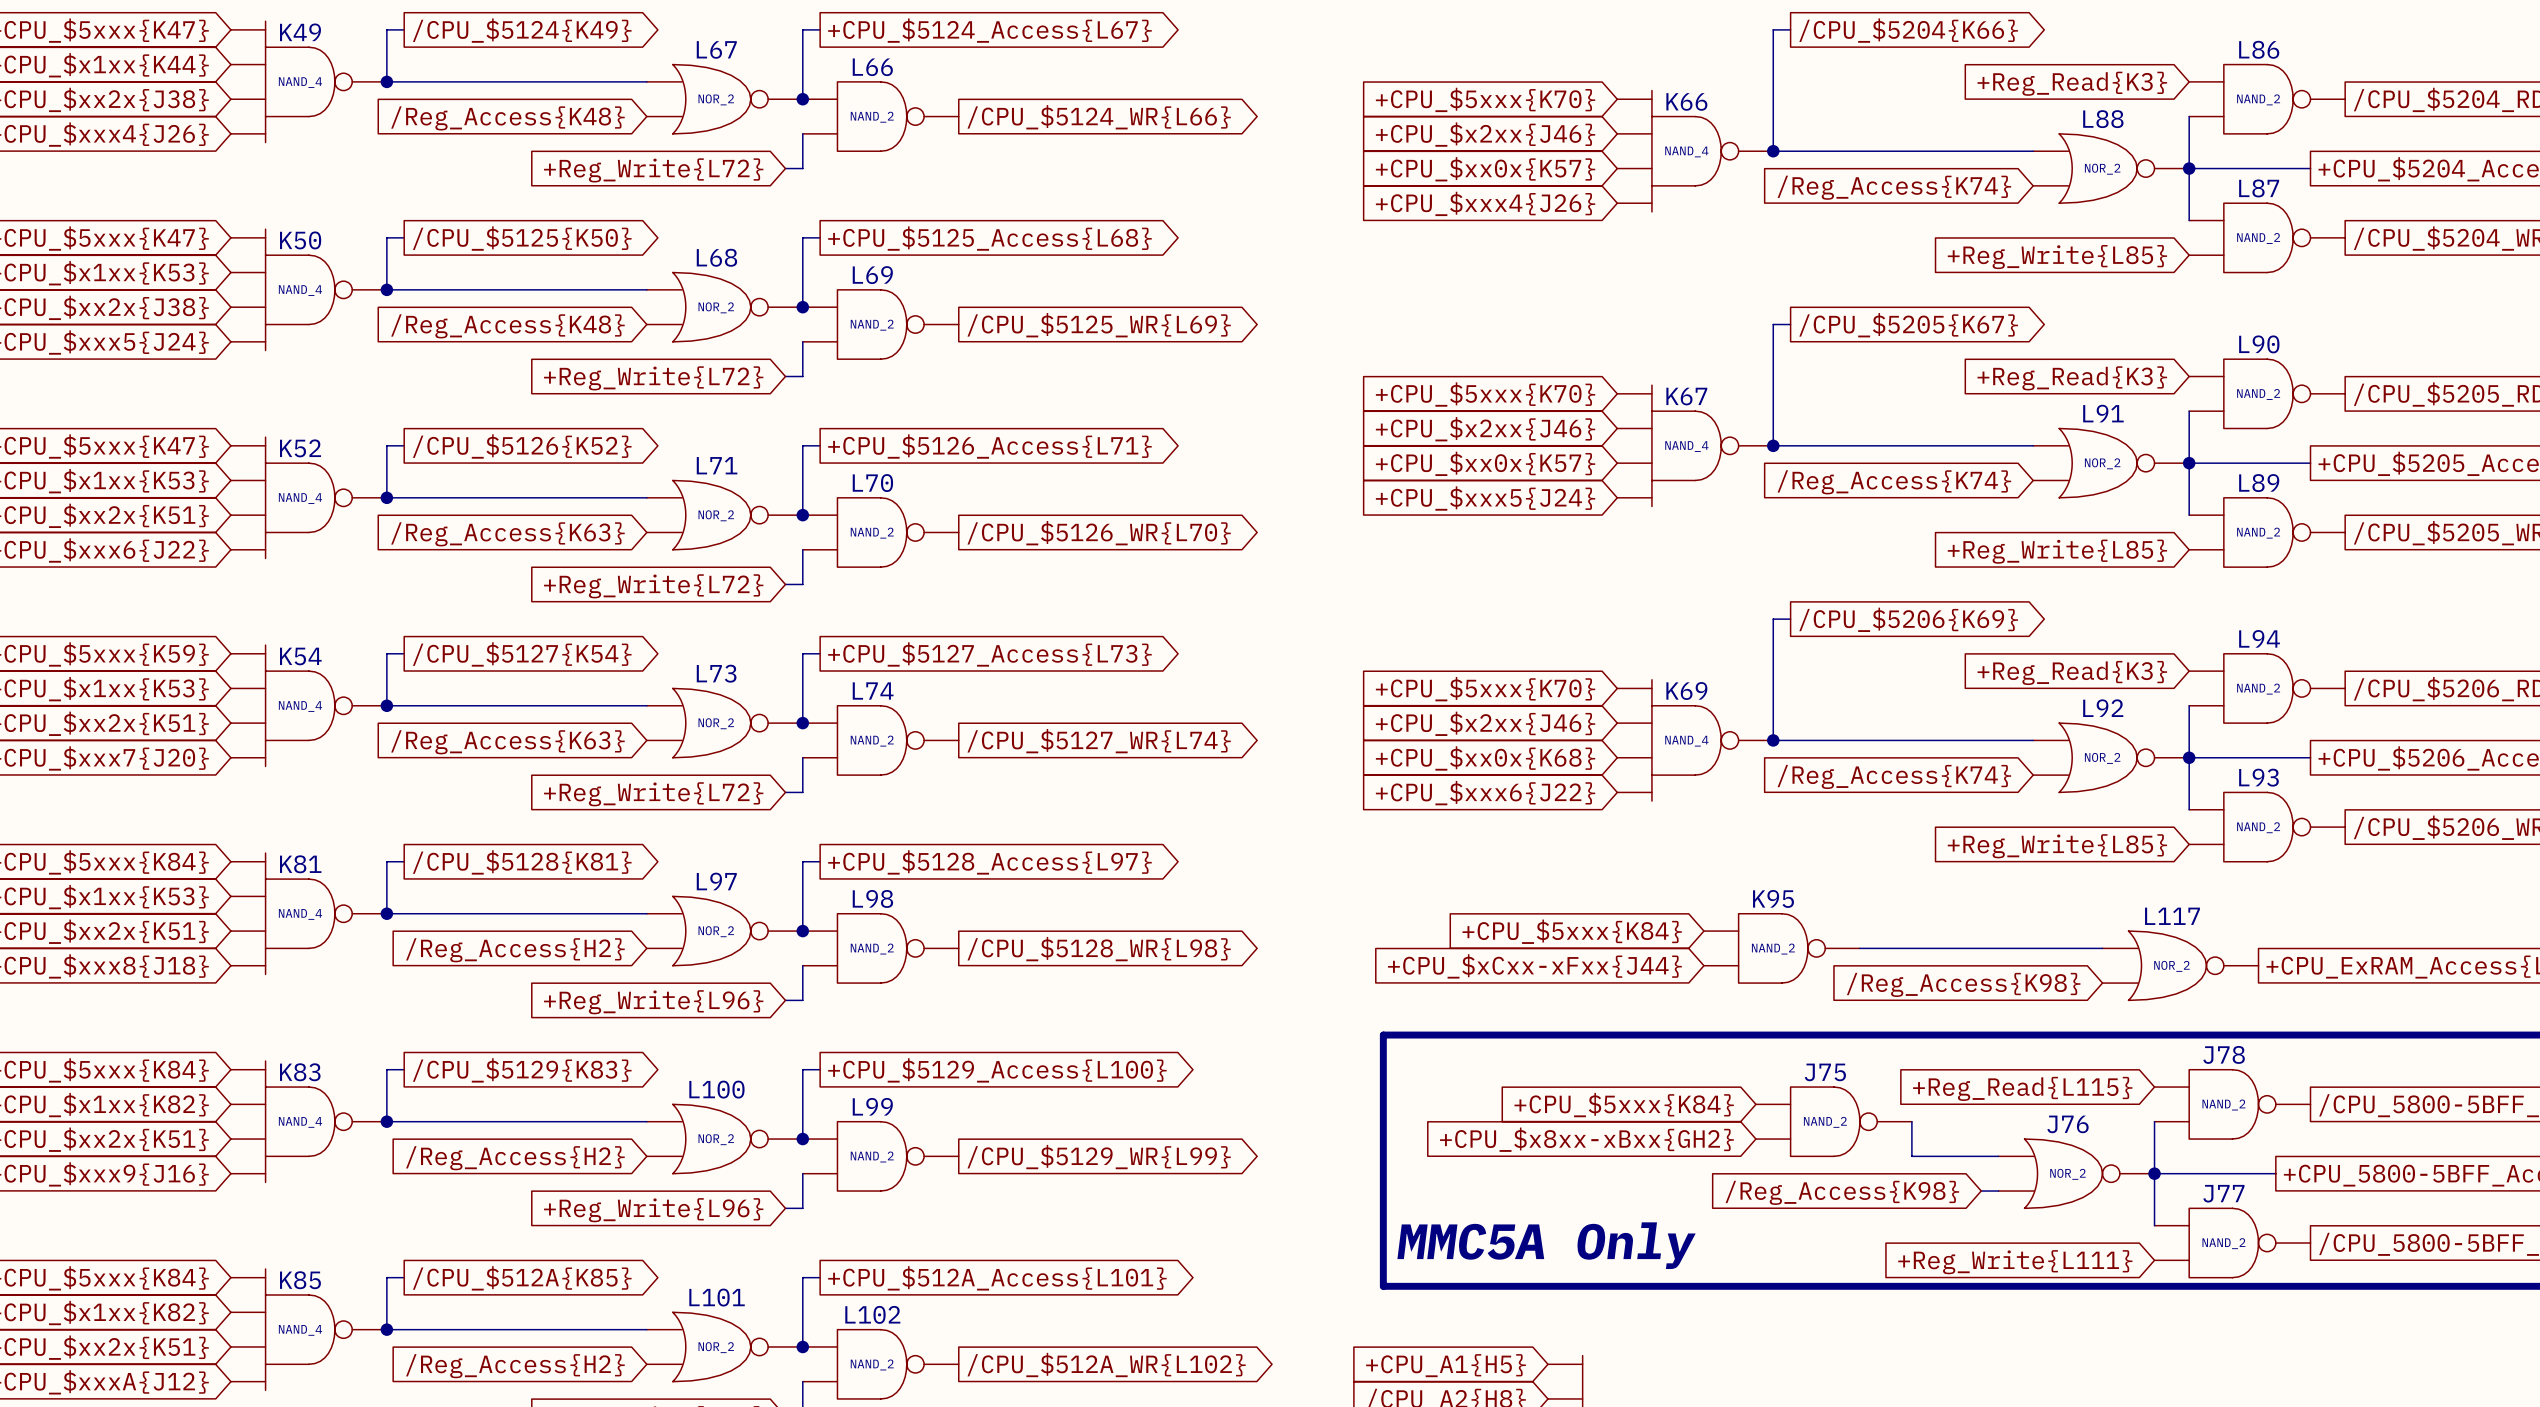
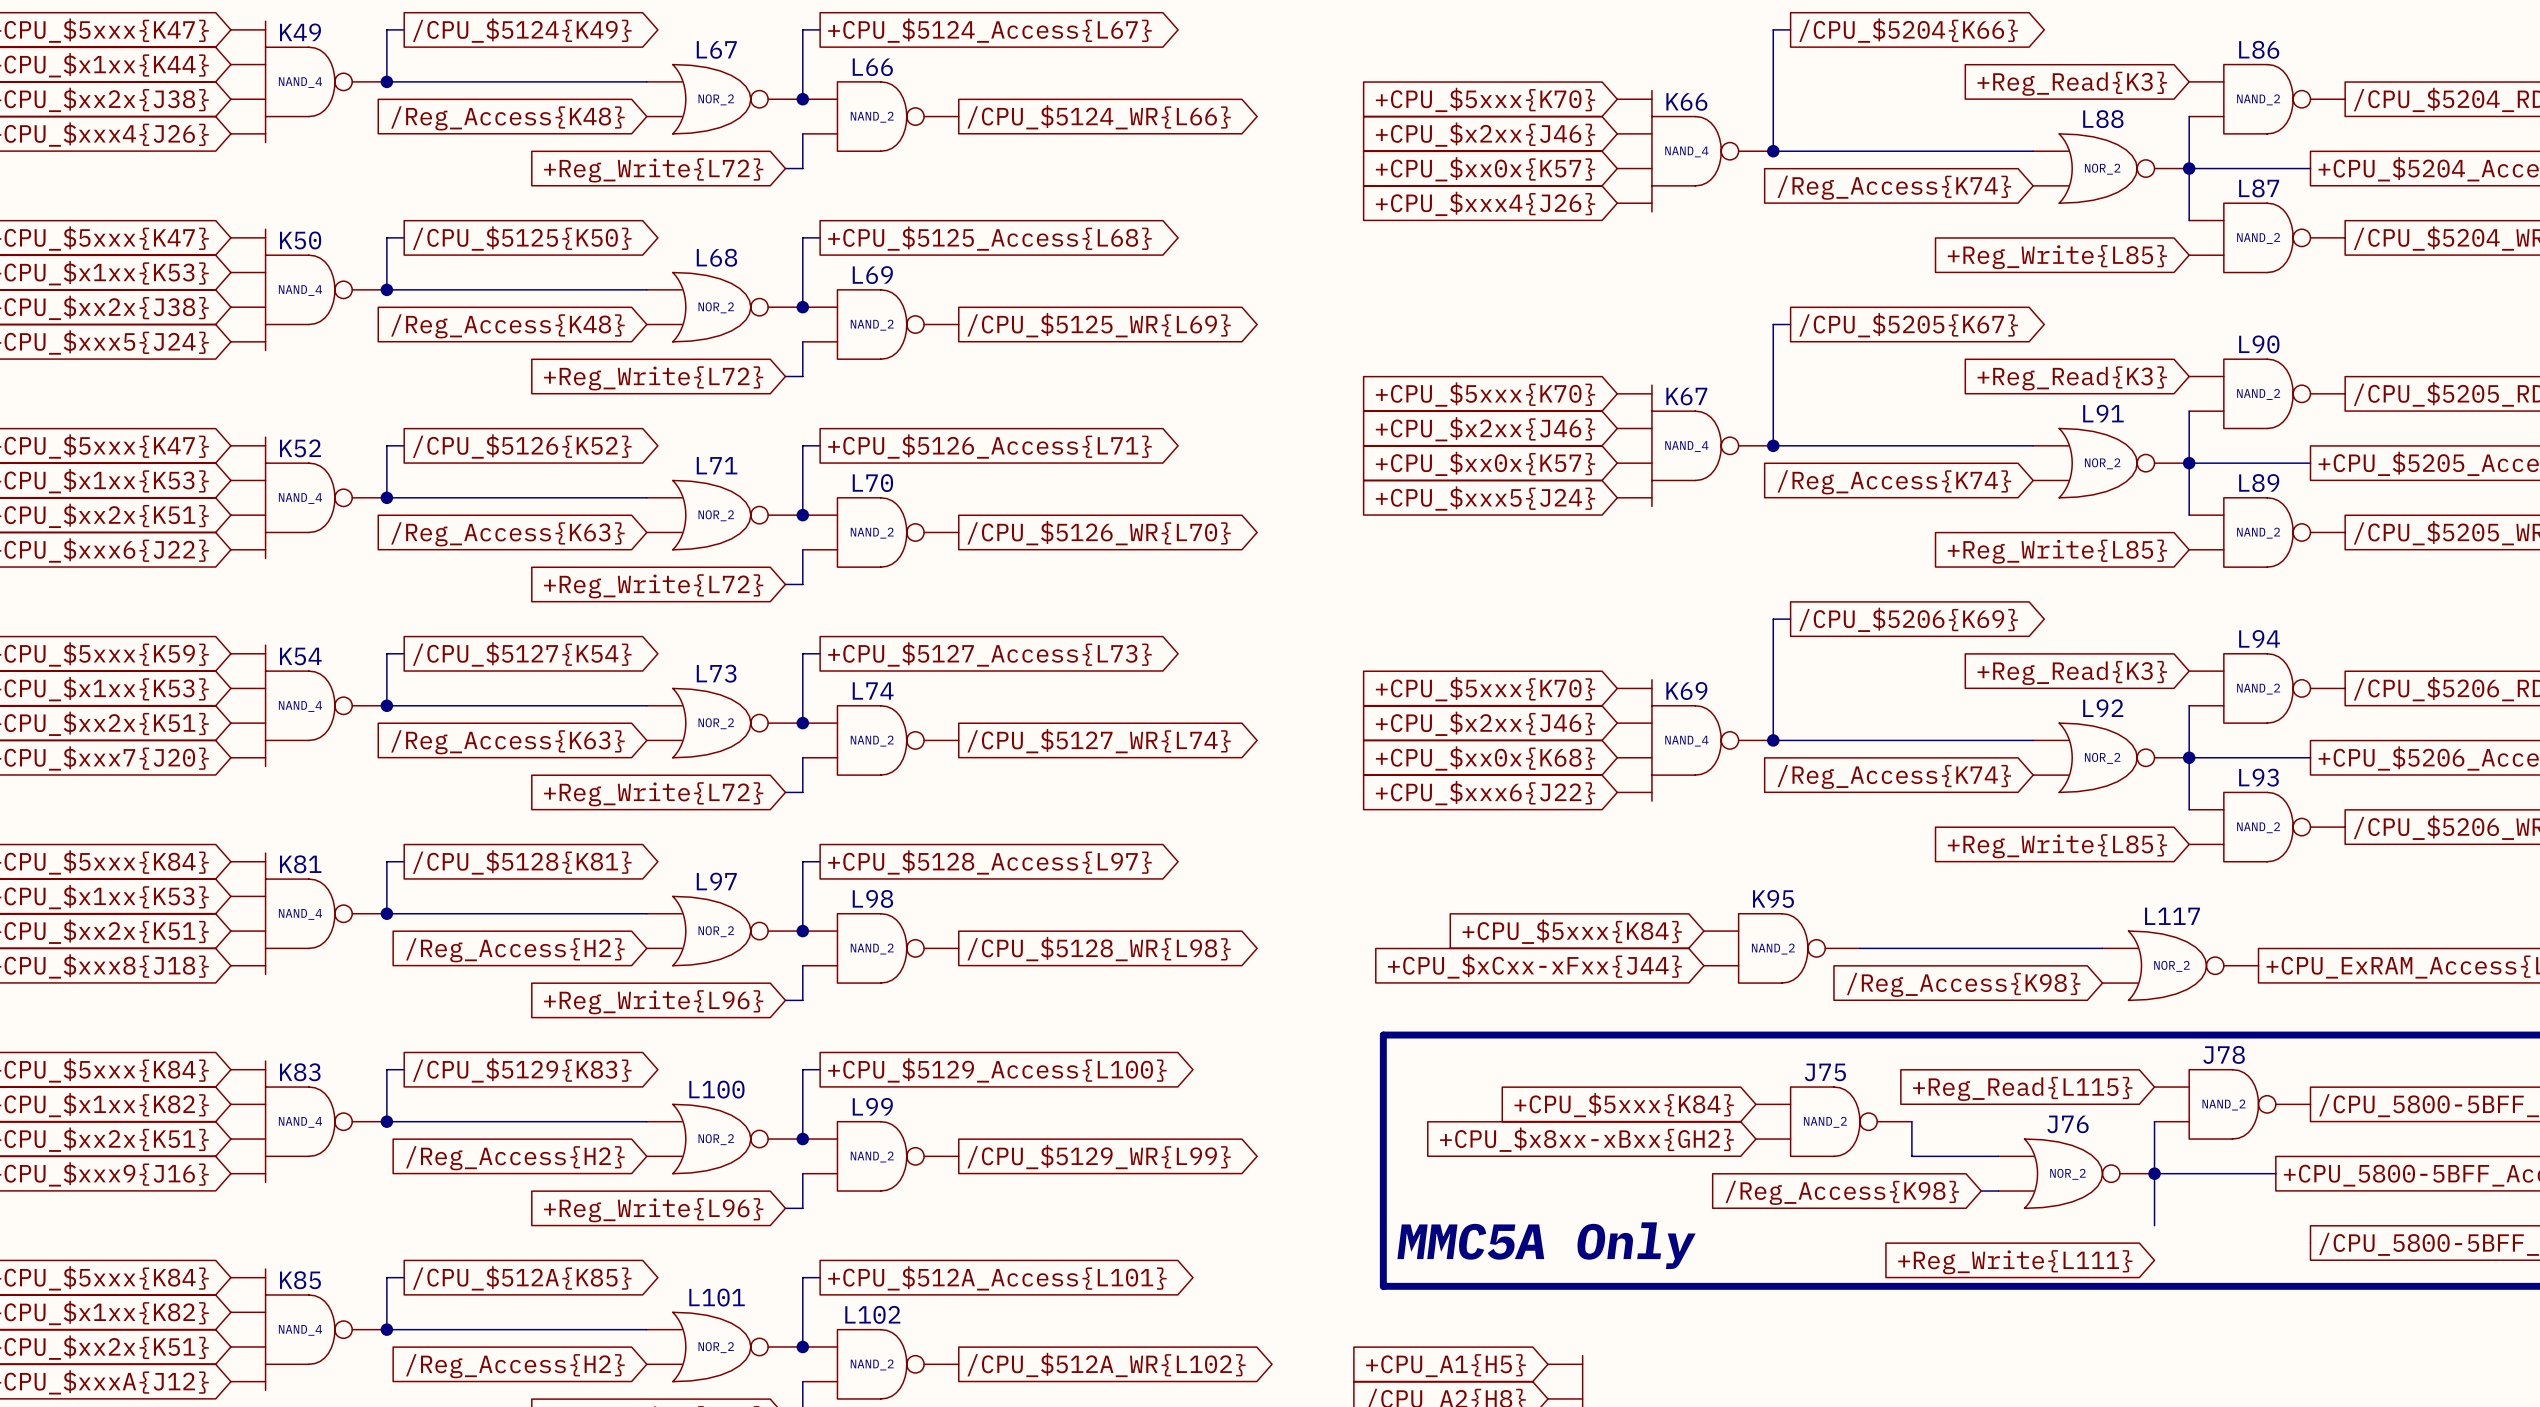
J77: NAND_2 (2232, 1243) -> none

